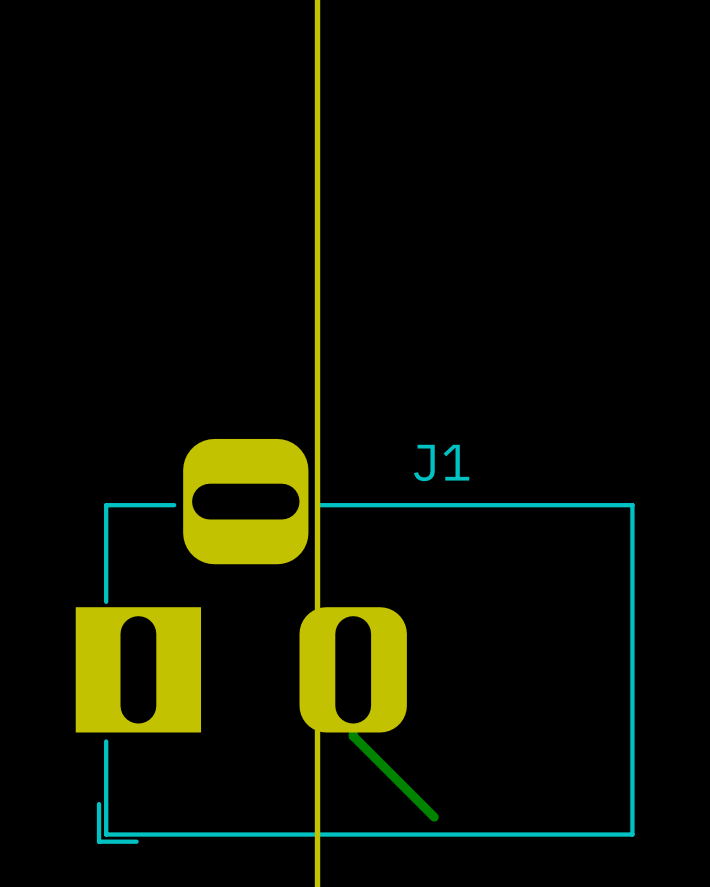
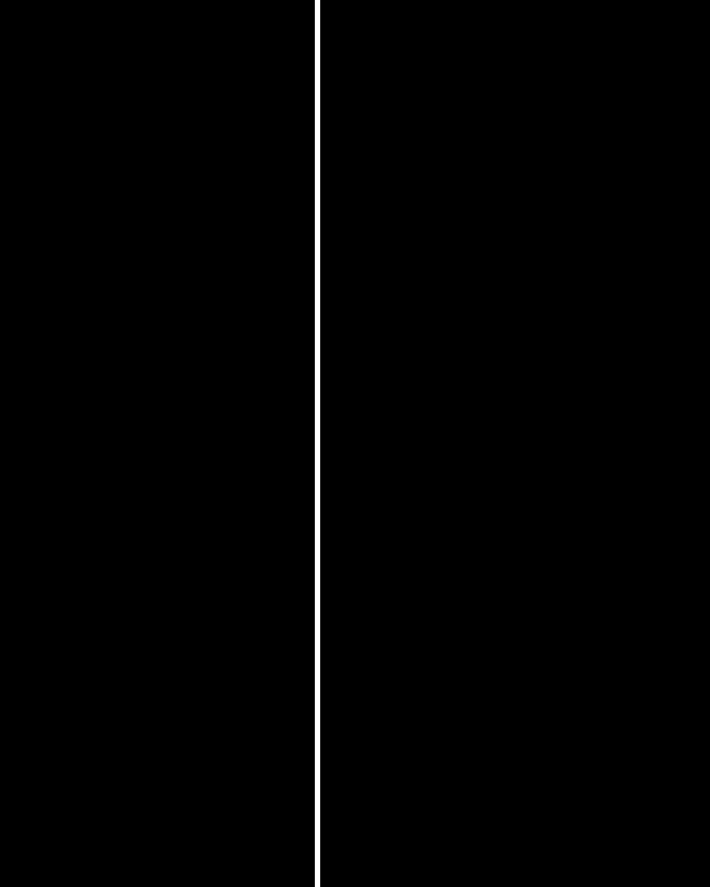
J1: (355, 641) -> none
bottom track: (353, 669) (353, 736) (434, 817) -> none

